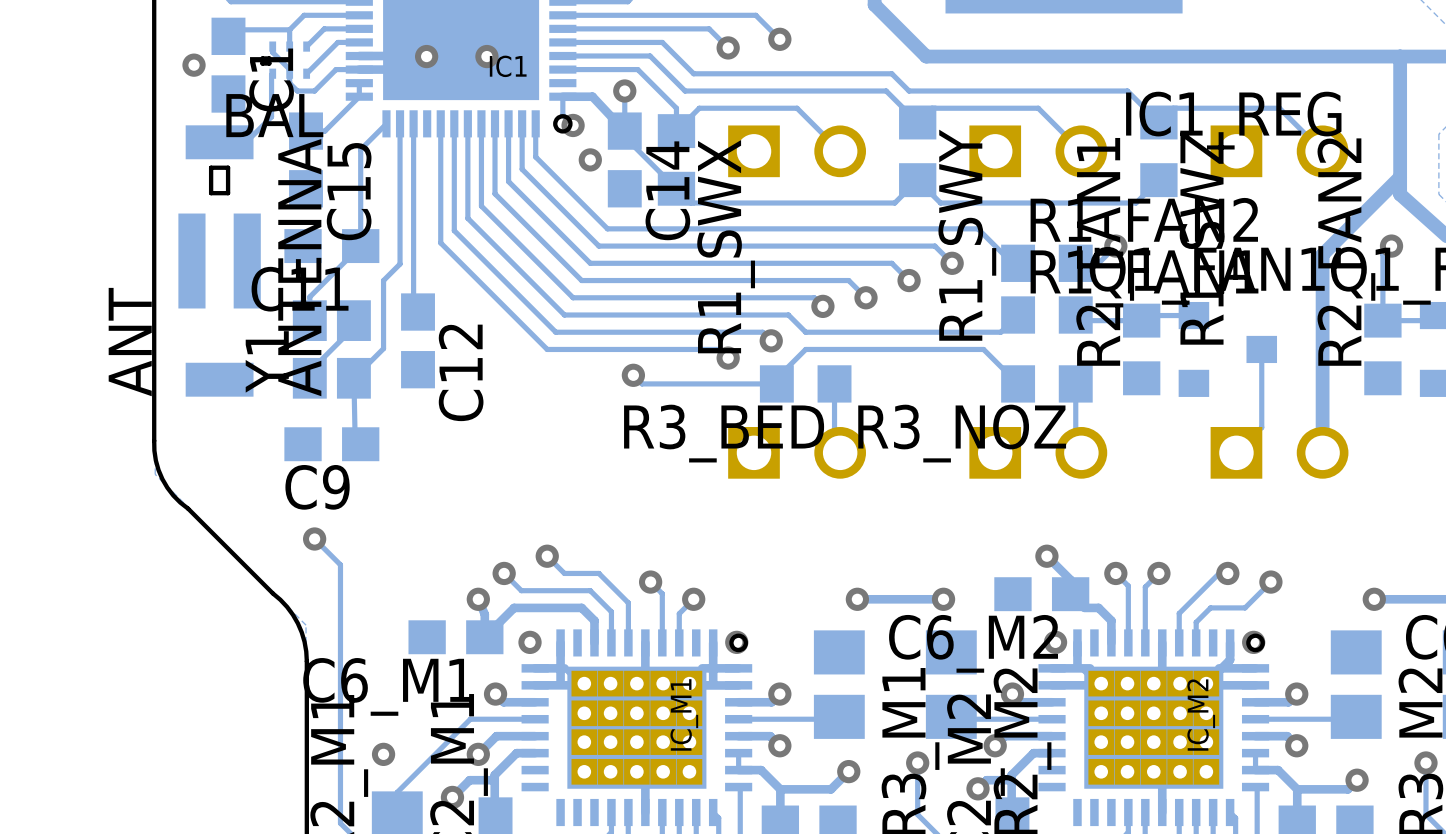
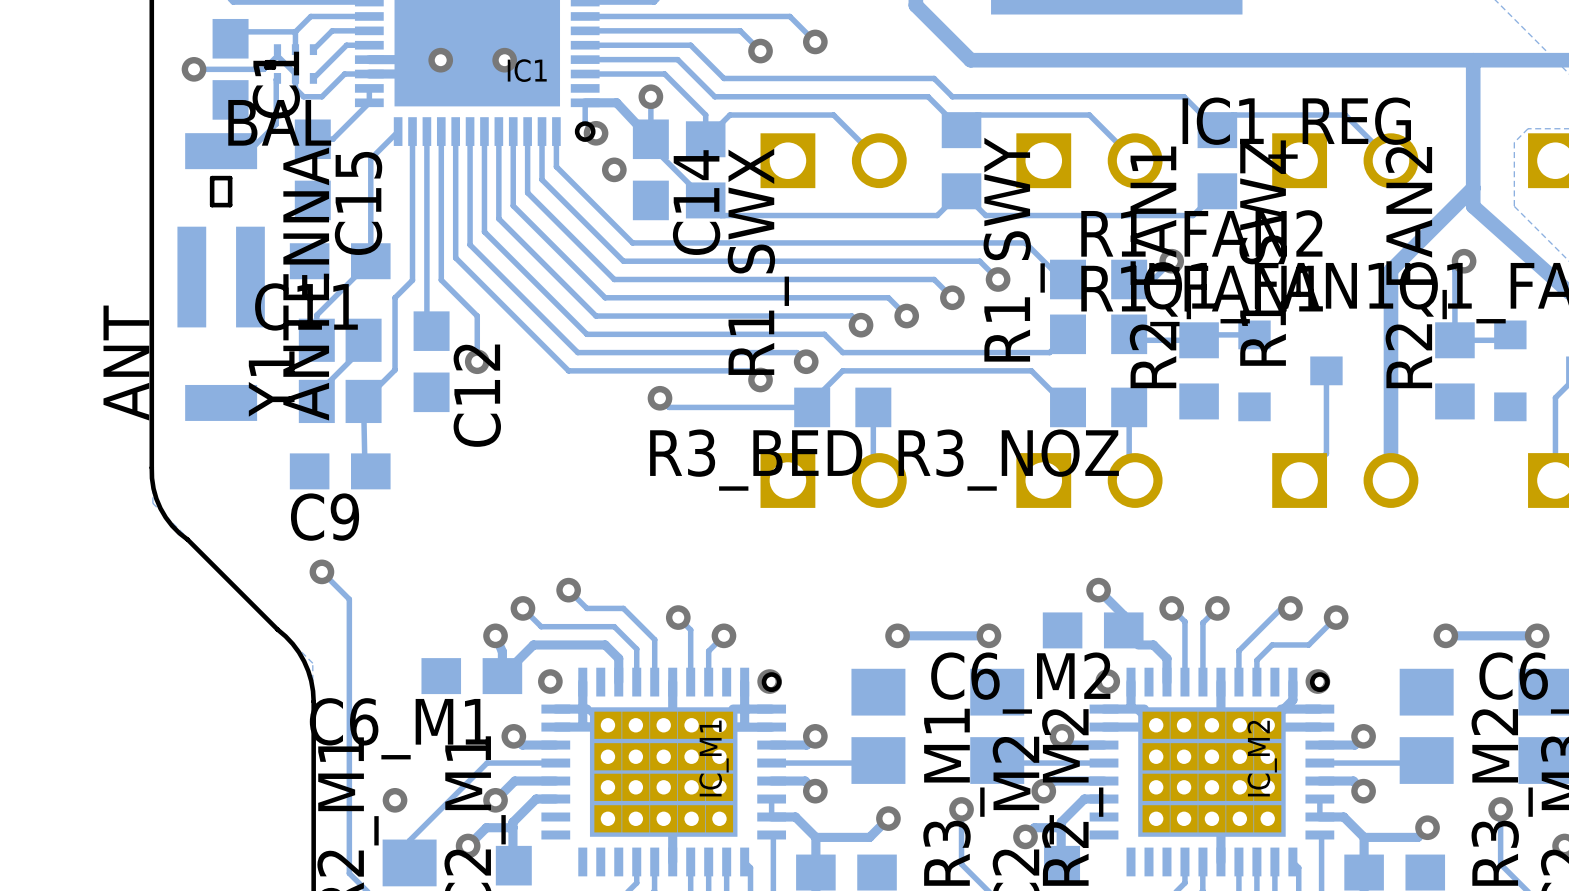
track: none -> (277, 55) (263, 69) (194, 69)
track: none -> (441, 131) (441, 280) (477, 316) (477, 361)
via: none -> (477, 361)

